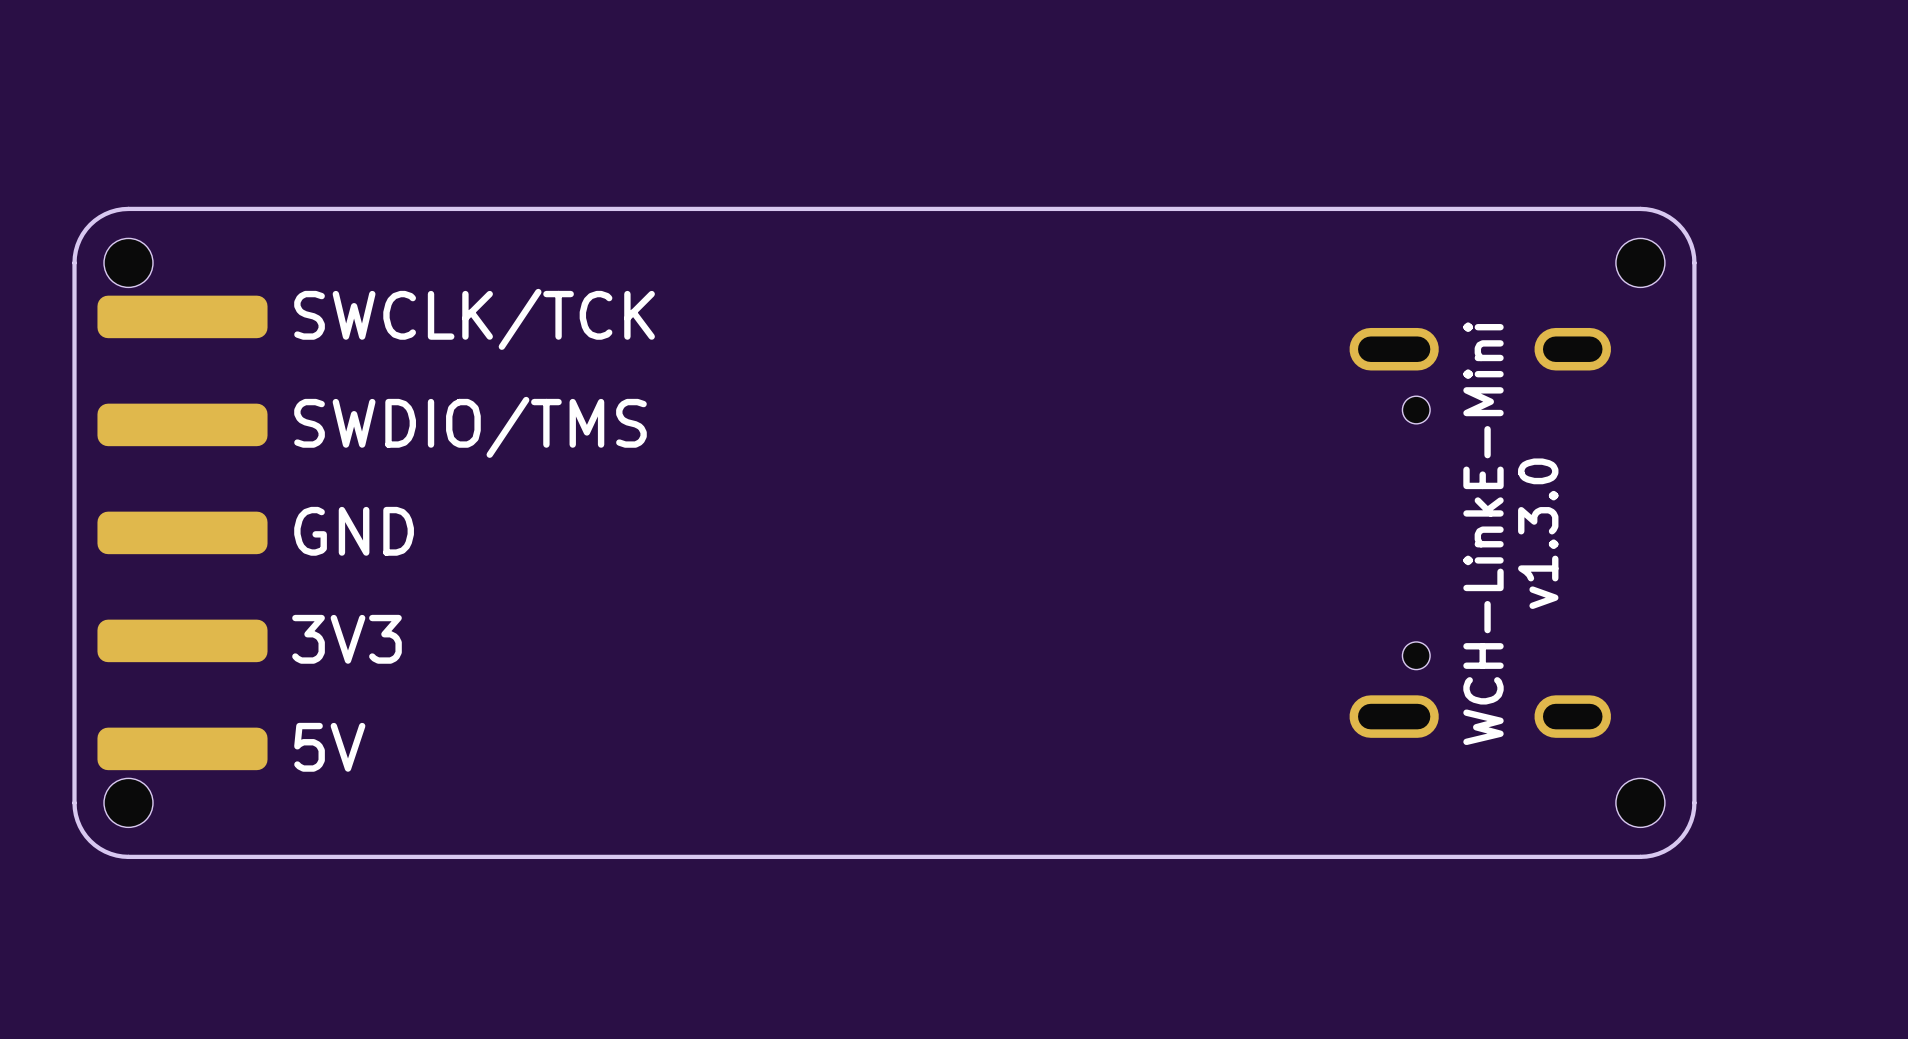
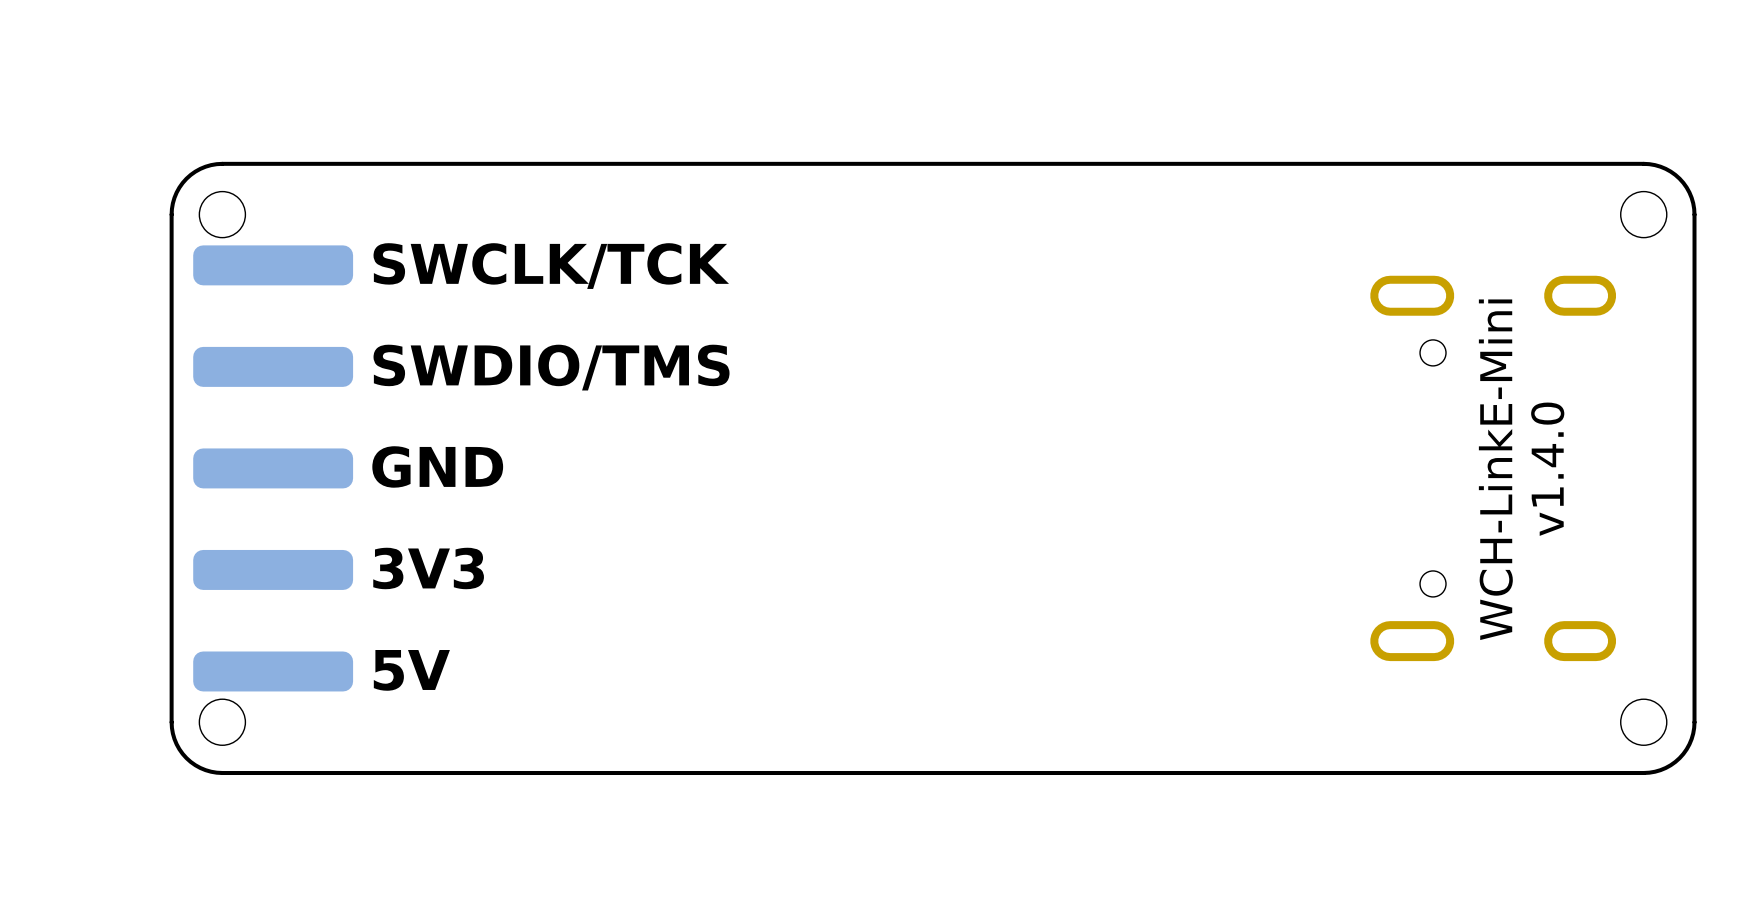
text: v1.3.0 (1538, 533) -> v1.4.0 (1547, 469)

